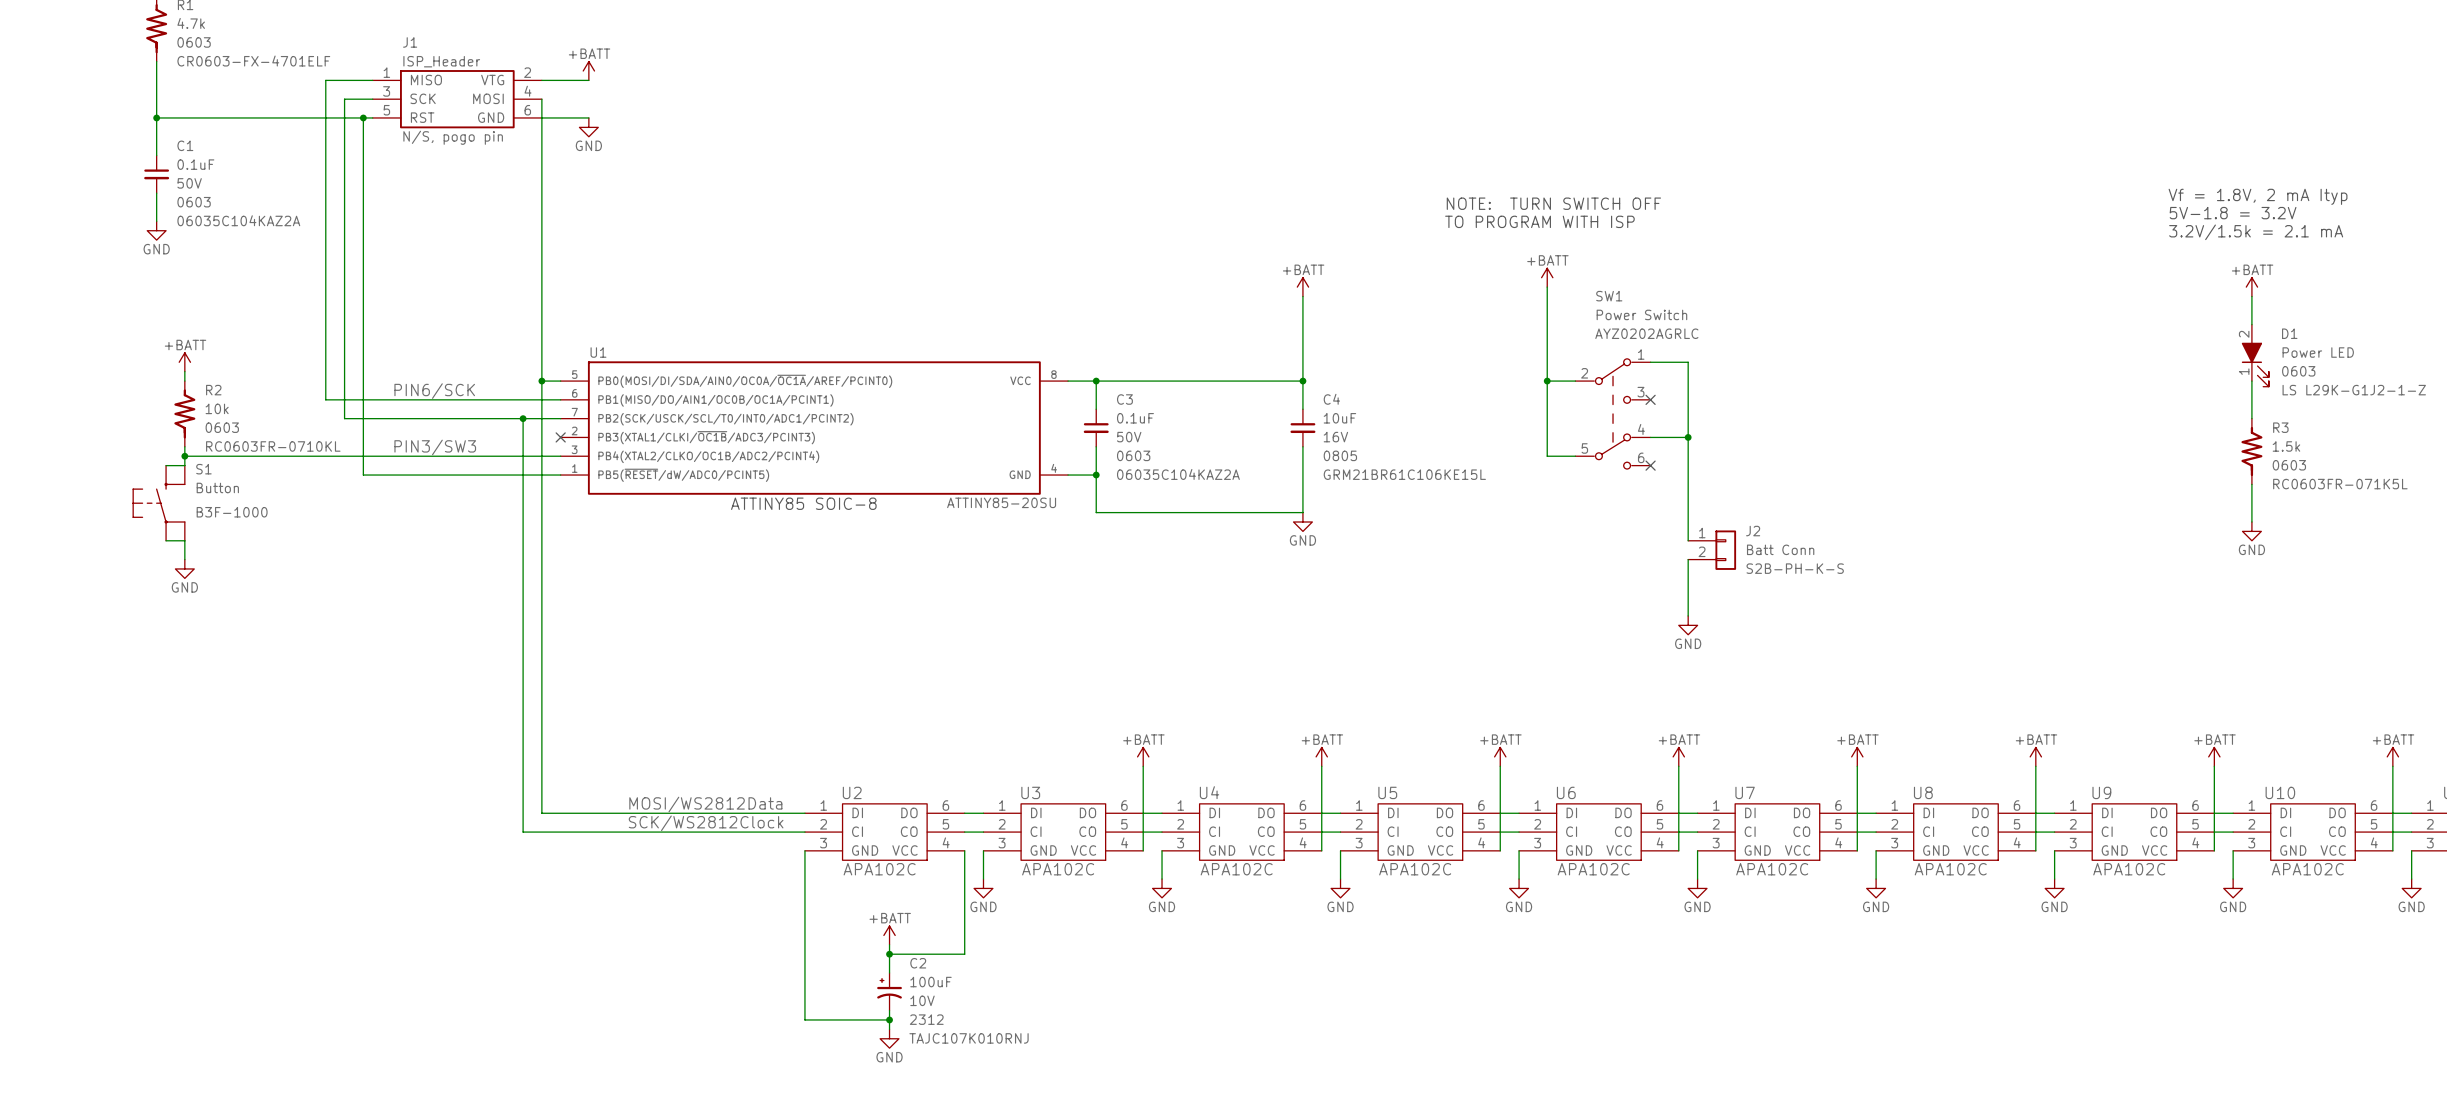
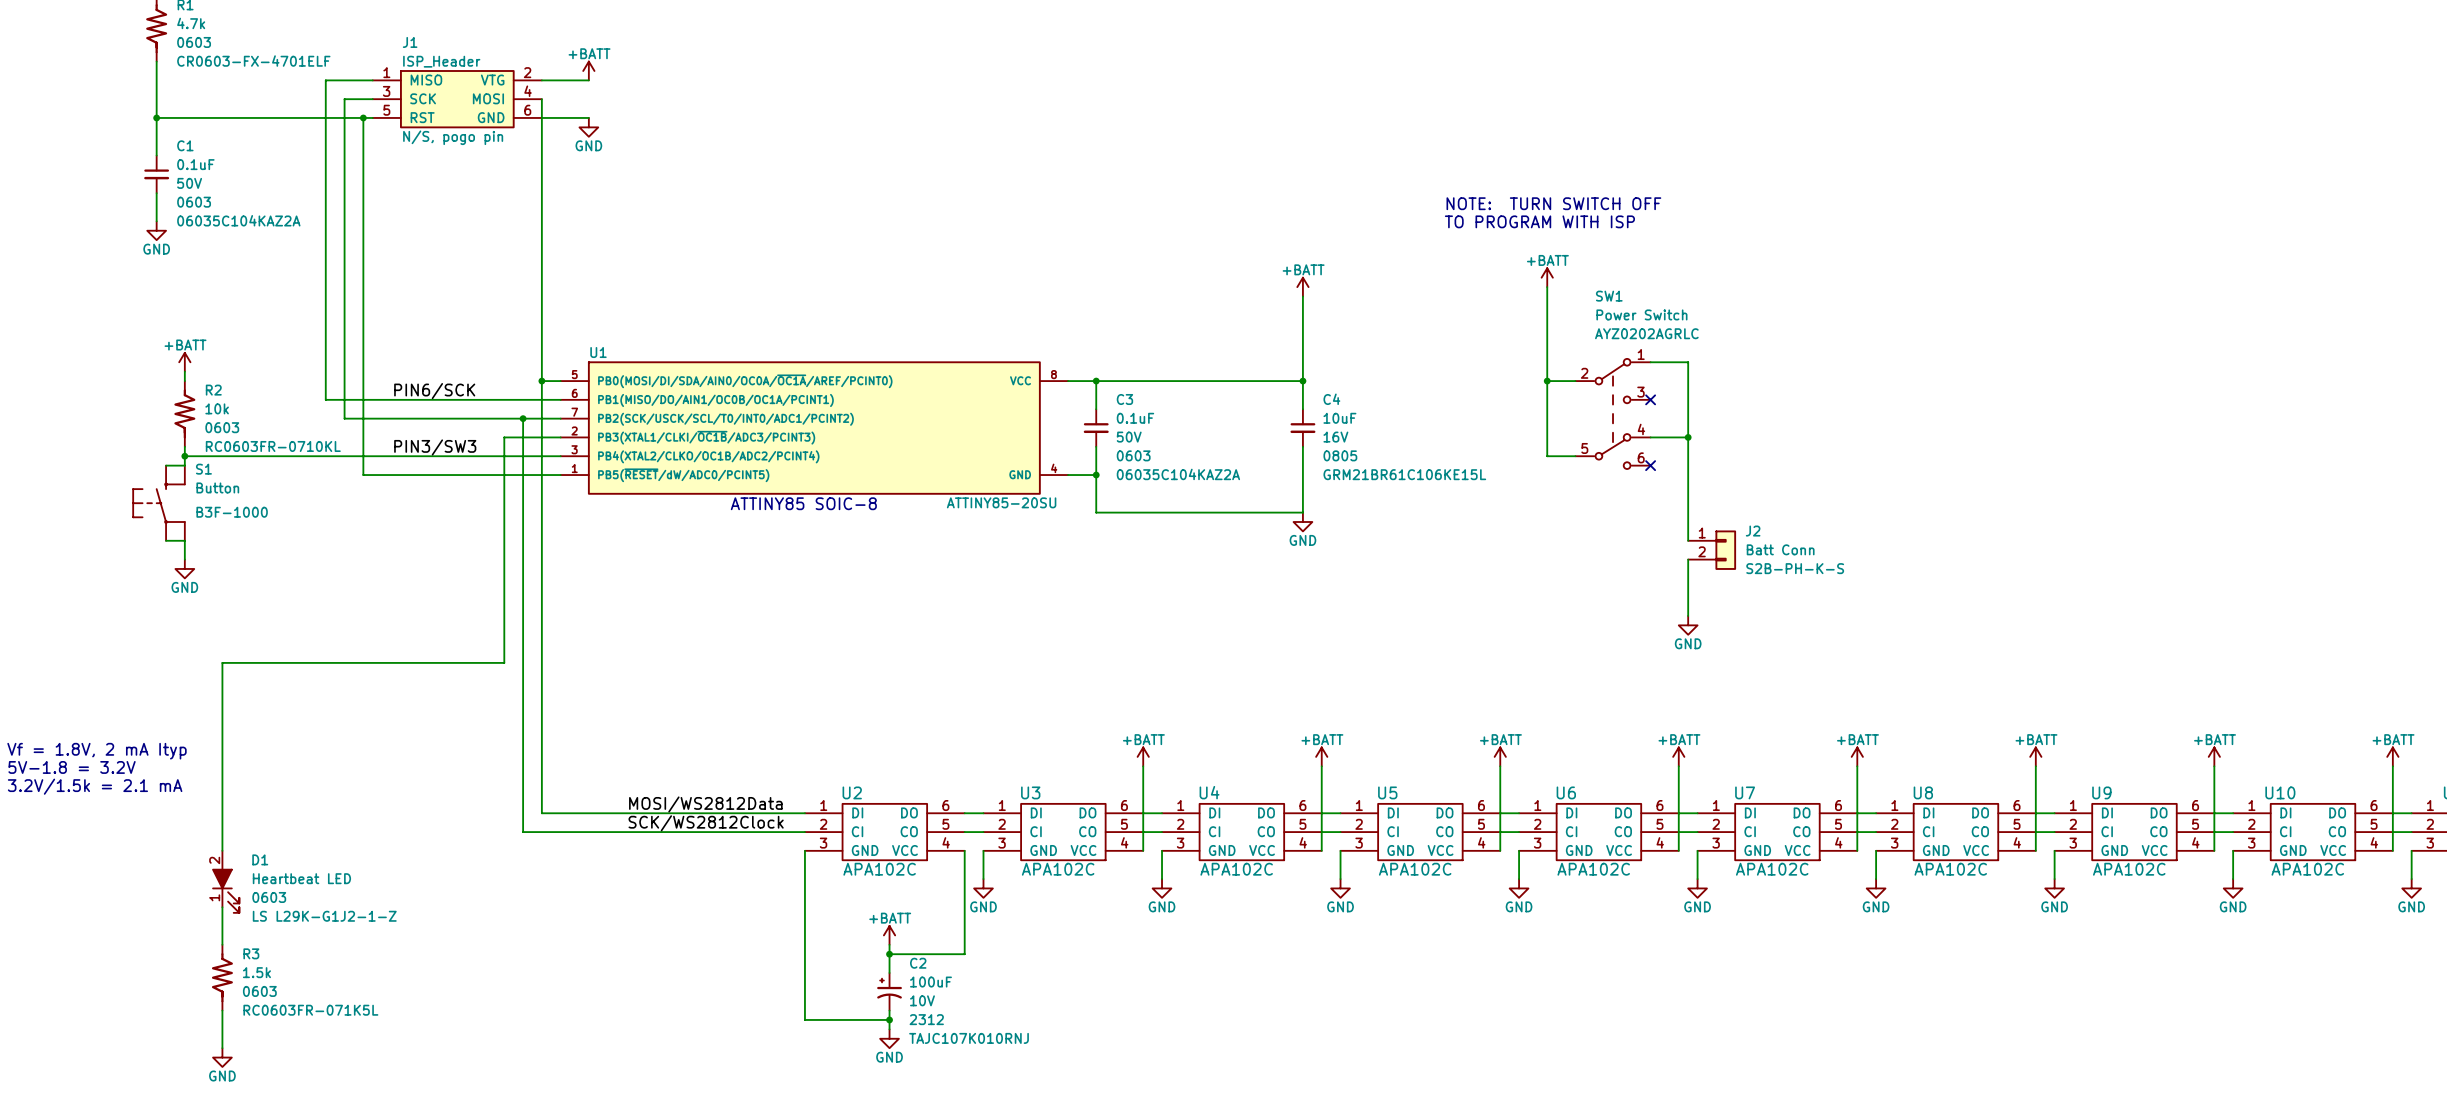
text: Vf = 1.8V, 2 mA Ityp (2258, 196) -> none
text: 5V-1.8 = 3.2V (2233, 213) -> none
text: 3.2V/1.5k = 2.1 mA (2256, 232) -> none
power symbol: +BATT (2251, 287) -> none
wire: (2251, 296) (2251, 324) -> none
D1 value: Power LED (2318, 352) -> Heartbeat LED (301, 878)
D1 position: (2255, 355) -> (225, 881)
wire: (2251, 381) (2251, 418) -> none
wire: none -> (560, 437) (504, 437) (504, 662) (222, 662) (222, 850)
no-connect mark: (560, 437) -> none
R3 position: (2251, 451) -> (222, 977)
wire: (2251, 484) (2251, 522) -> none
power symbol: GND (2251, 531) -> none
text: none -> Vf = 1.8V, 2 mA Ityp (96, 751)
text: none -> 5V-1.8 = 3.2V (72, 767)
text: none -> 3.2V/1.5k = 2.1 mA (95, 786)
wire: none -> (222, 907) (222, 944)
wire: none -> (222, 1010) (222, 1048)
power symbol: none -> GND (222, 1057)

